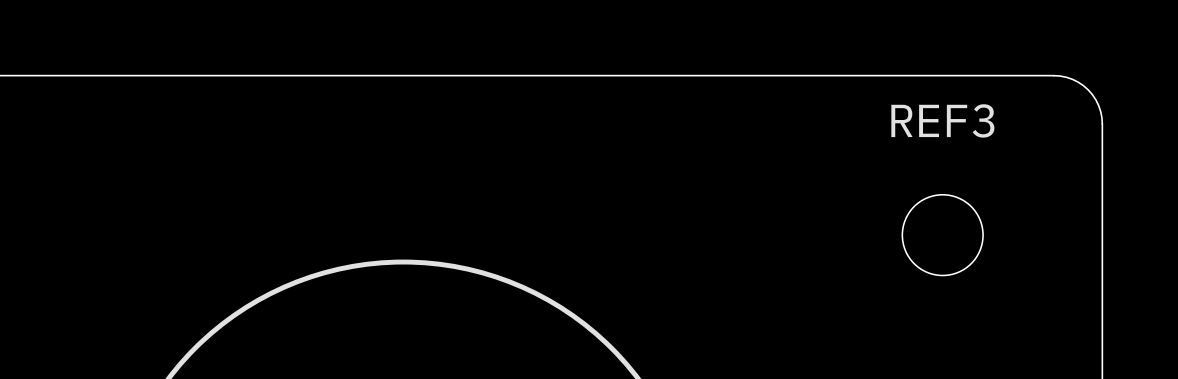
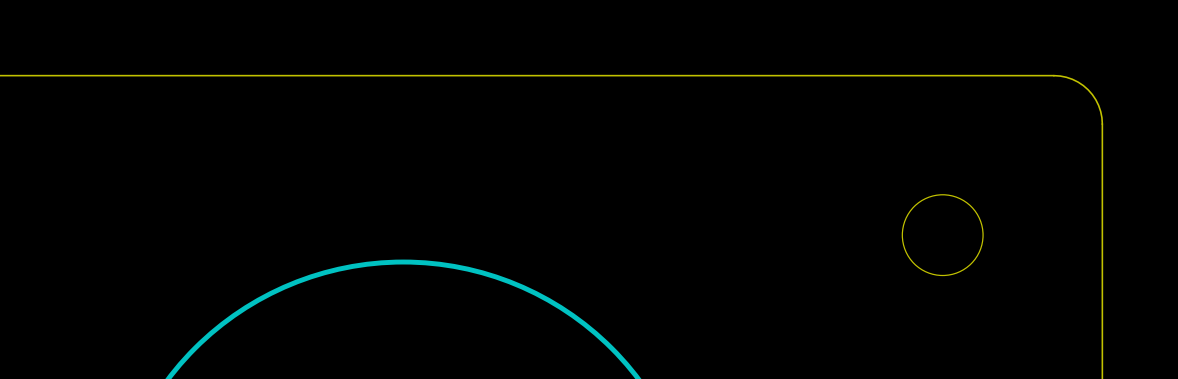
REF3 name: REF3 (942, 120) -> none

